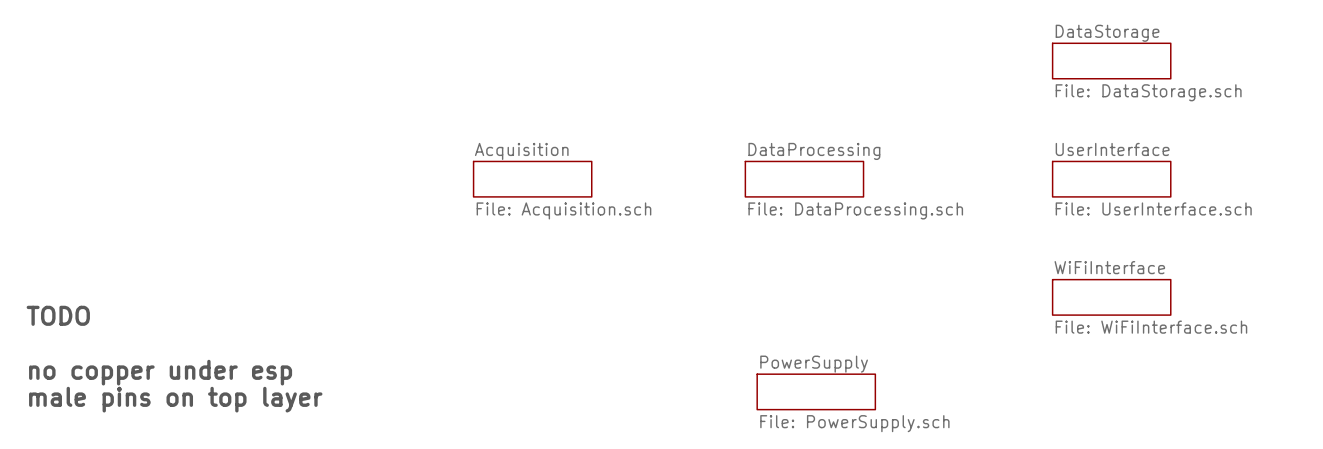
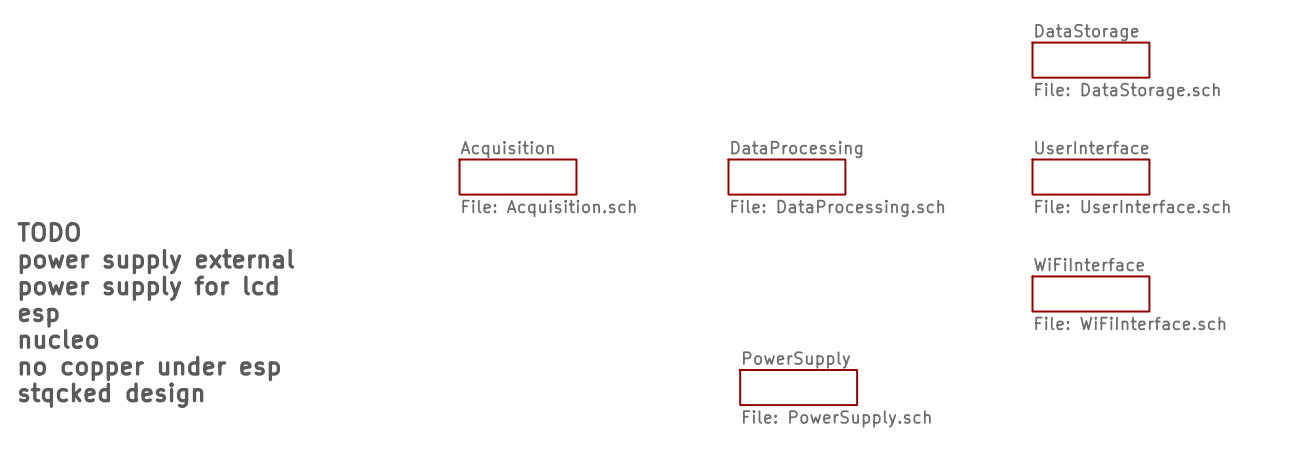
text: none -> TODO (48, 232)
text: none -> power supply external (156, 261)
text: none -> power supply for lcd (148, 288)
text: TODO (58, 315) -> esp (38, 317)
text: none -> nucleo (58, 338)
text: male pins on top layer (175, 399) -> stqcked design (111, 395)

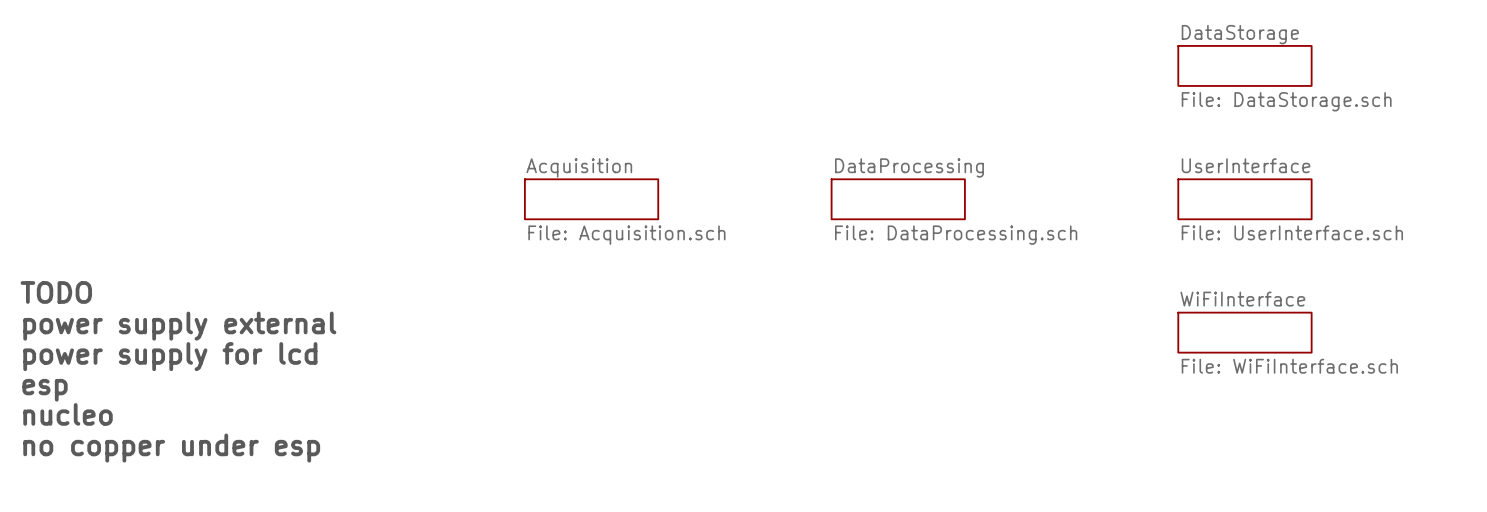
text: TODO (48, 232) -> none
text: power supply external (156, 261) -> TODO (56, 292)
text: power supply for lcd (148, 288) -> power supply external (179, 326)
text: esp (38, 317) -> power supply for lcd (170, 356)
text: nucleo (58, 338) -> esp (45, 390)
text: no copper under esp (149, 368) -> nucleo (68, 414)
sheet PowerSupply: File: PowerSupply.sch (798, 387) -> none
text: stqcked design (111, 395) -> no copper under esp (171, 448)

